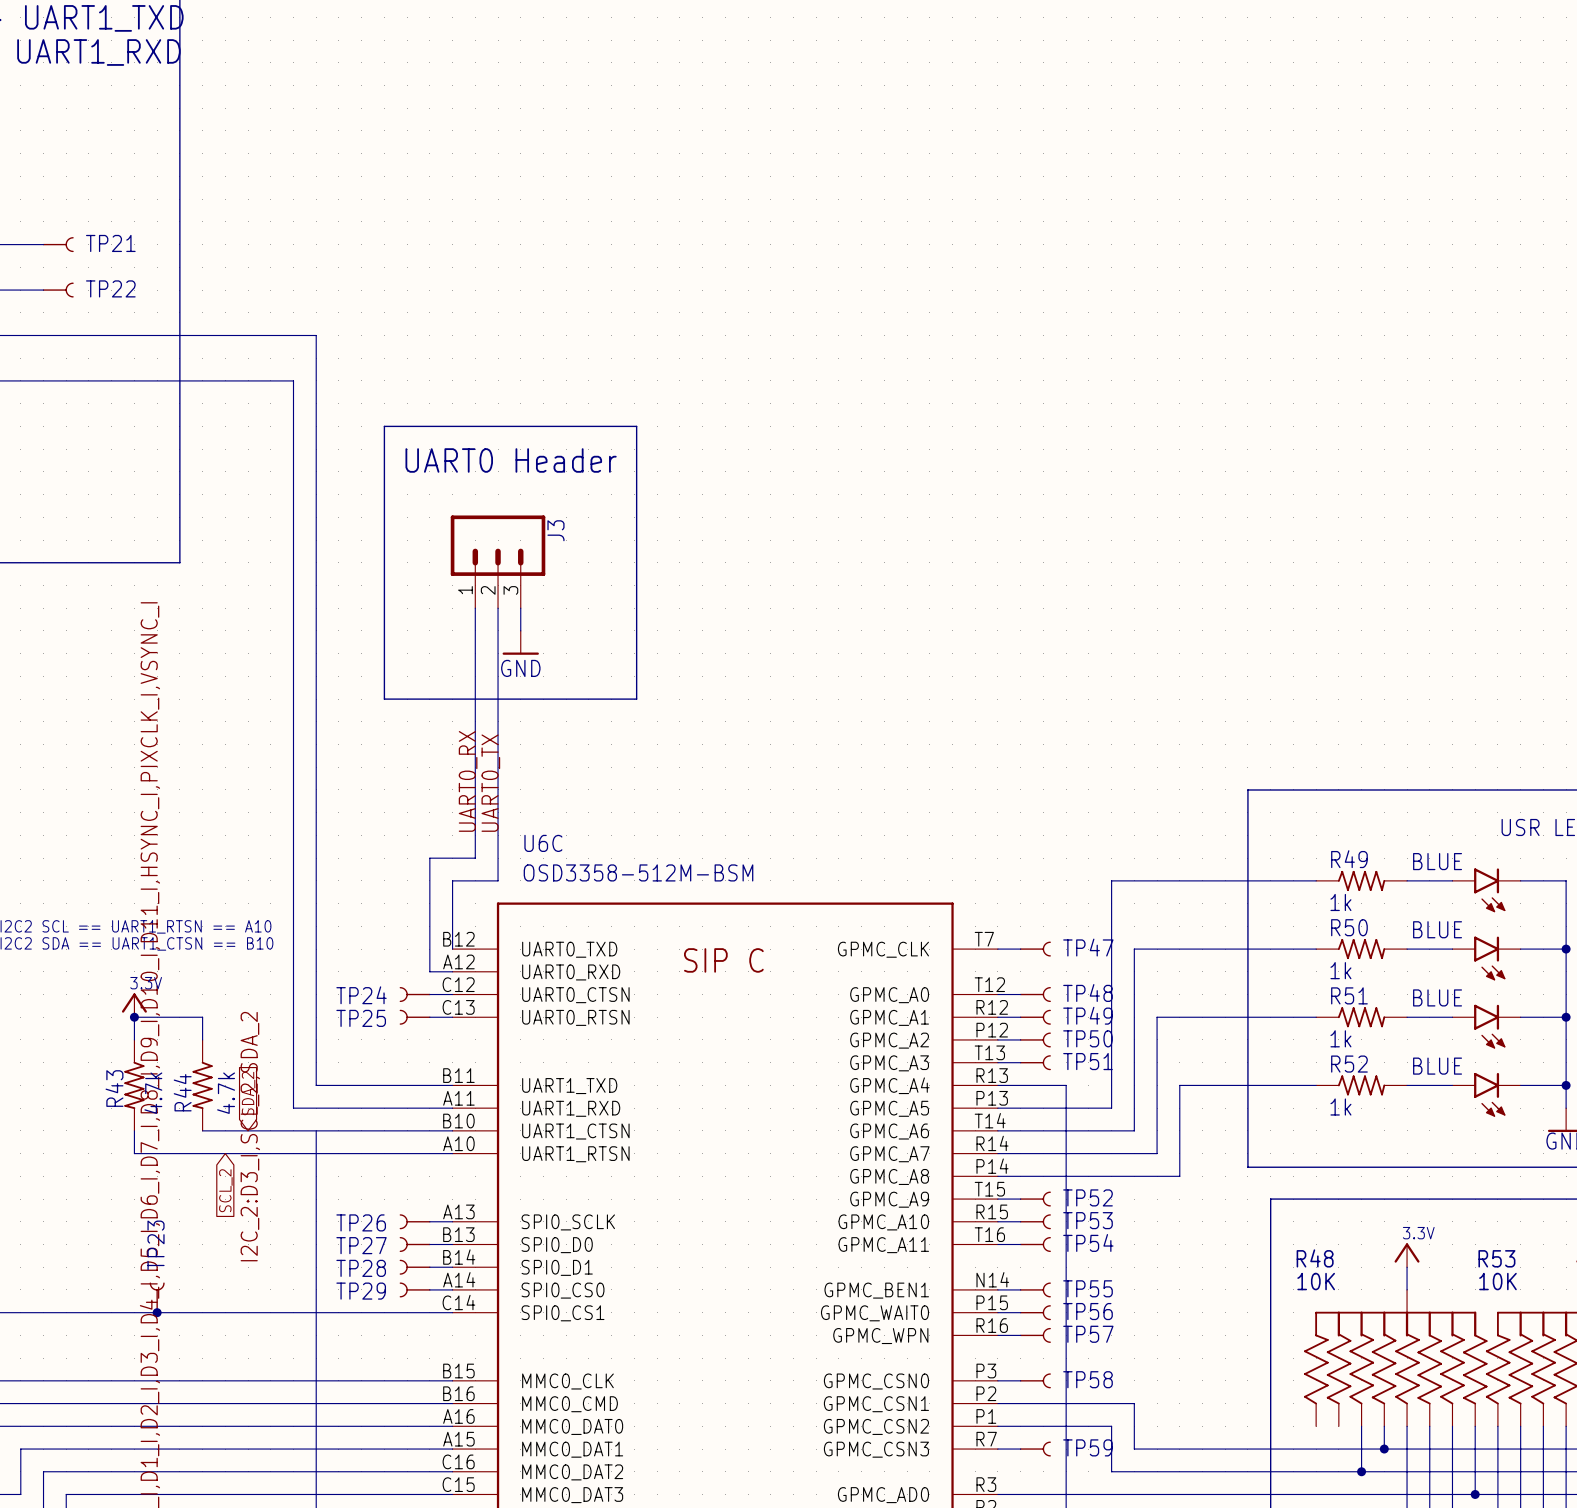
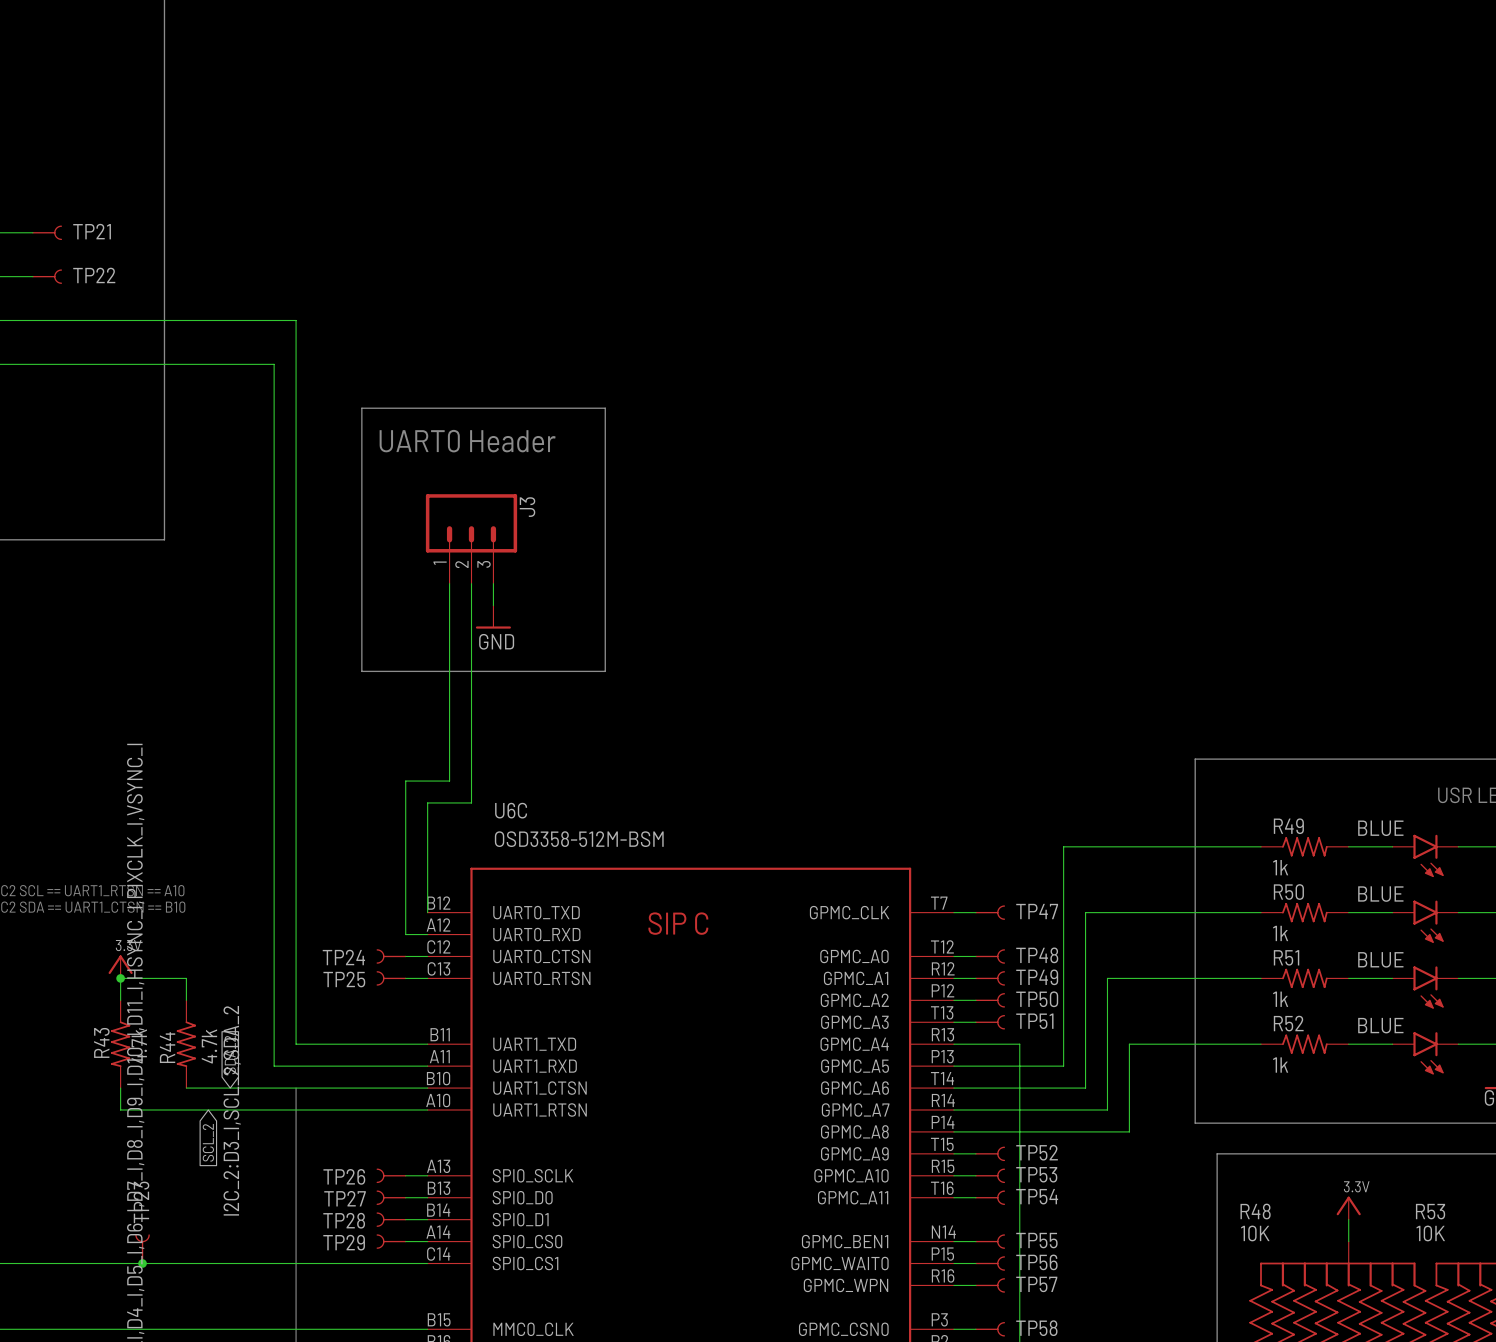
label: UART0_RX (468, 781) -> none
label: UART0_TX (490, 783) -> none
wire: (475, 812) (475, 858) (429, 858) -> (449, 781) (405, 781) (405, 824)
wire: (498, 835) (498, 880) (452, 880) -> (471, 802) (427, 802) (427, 846)

